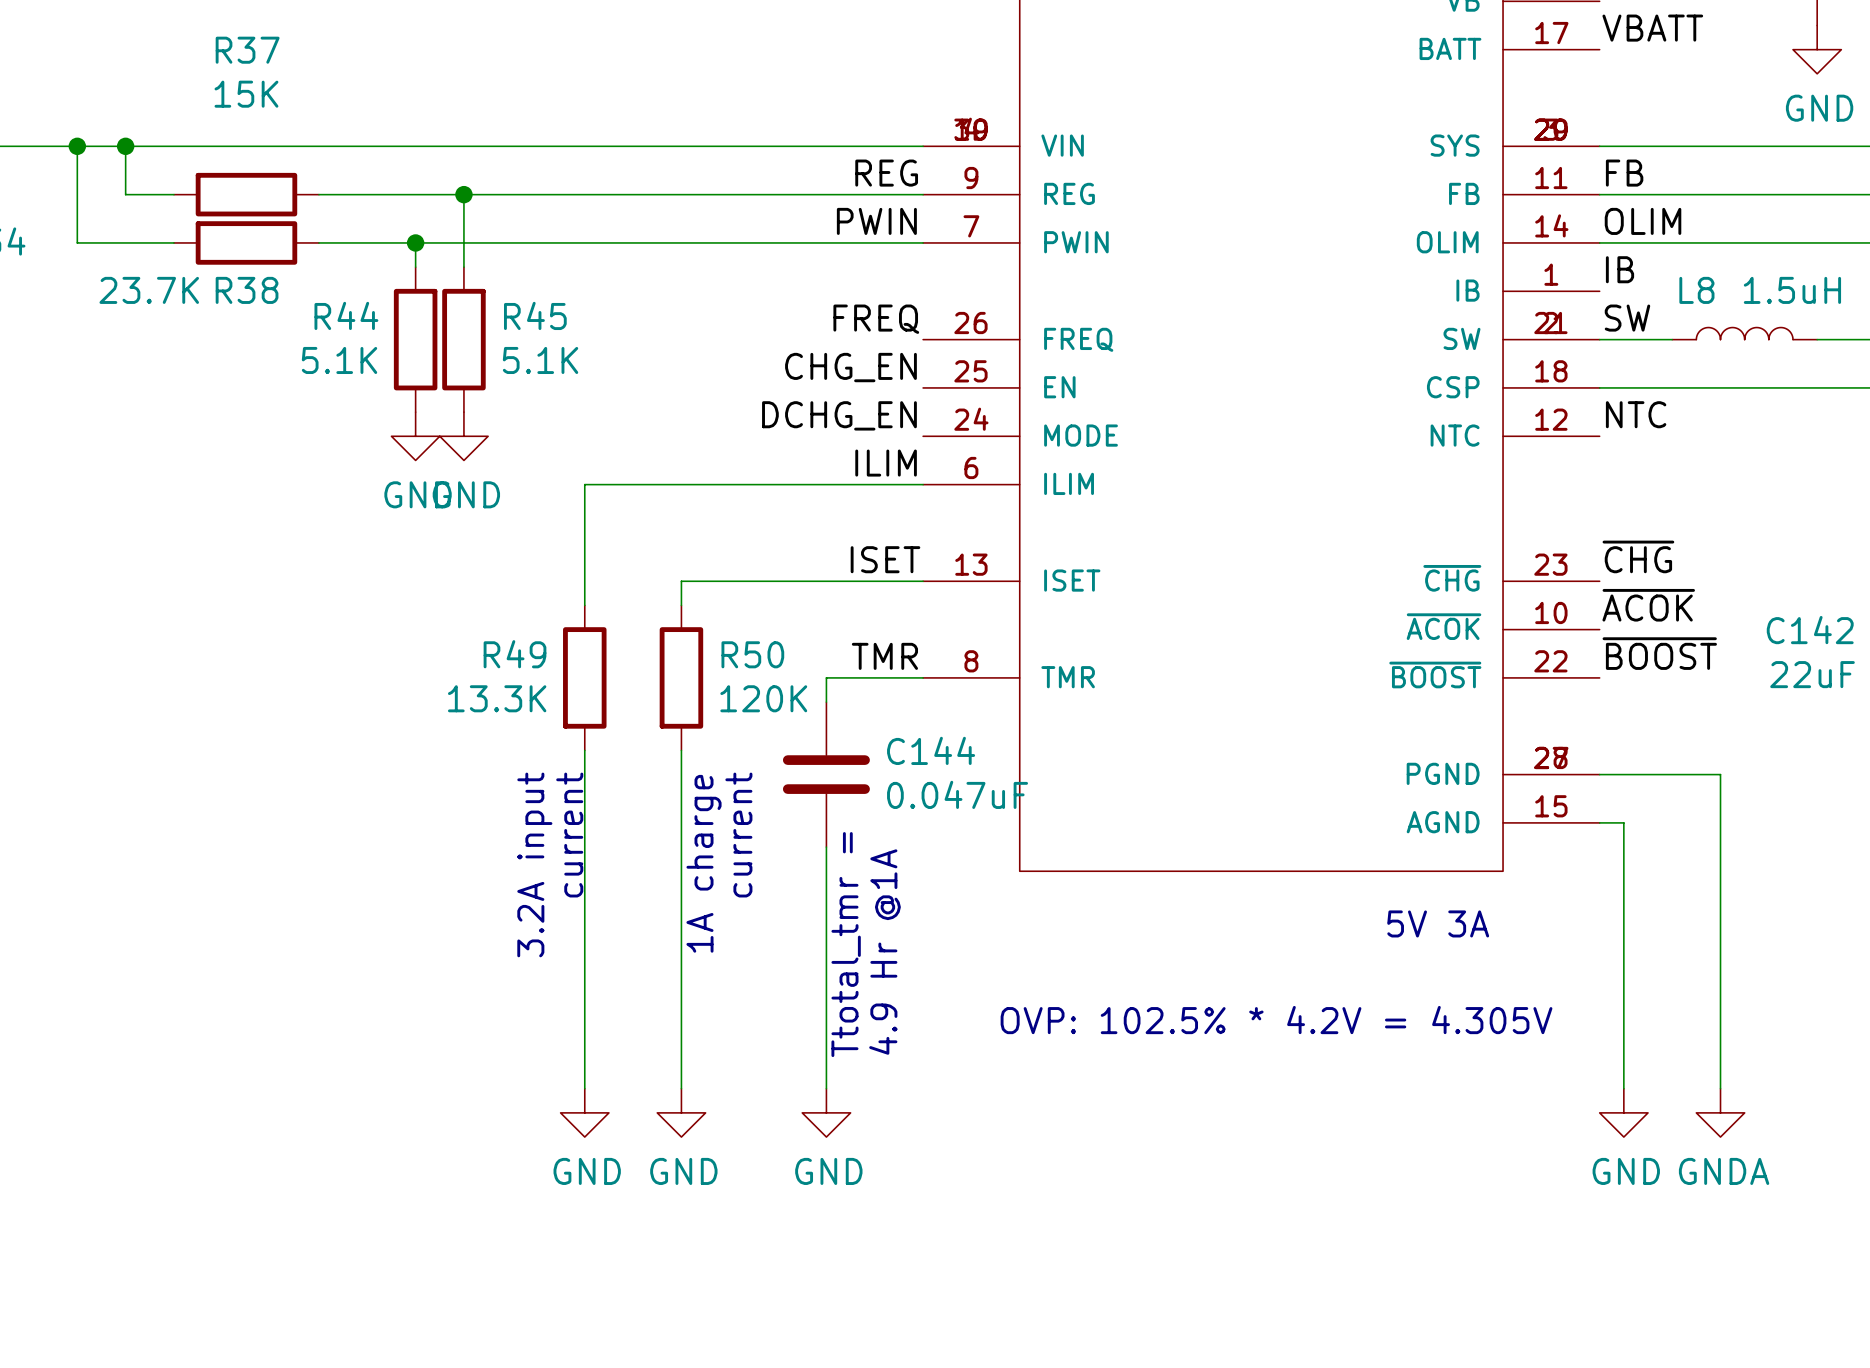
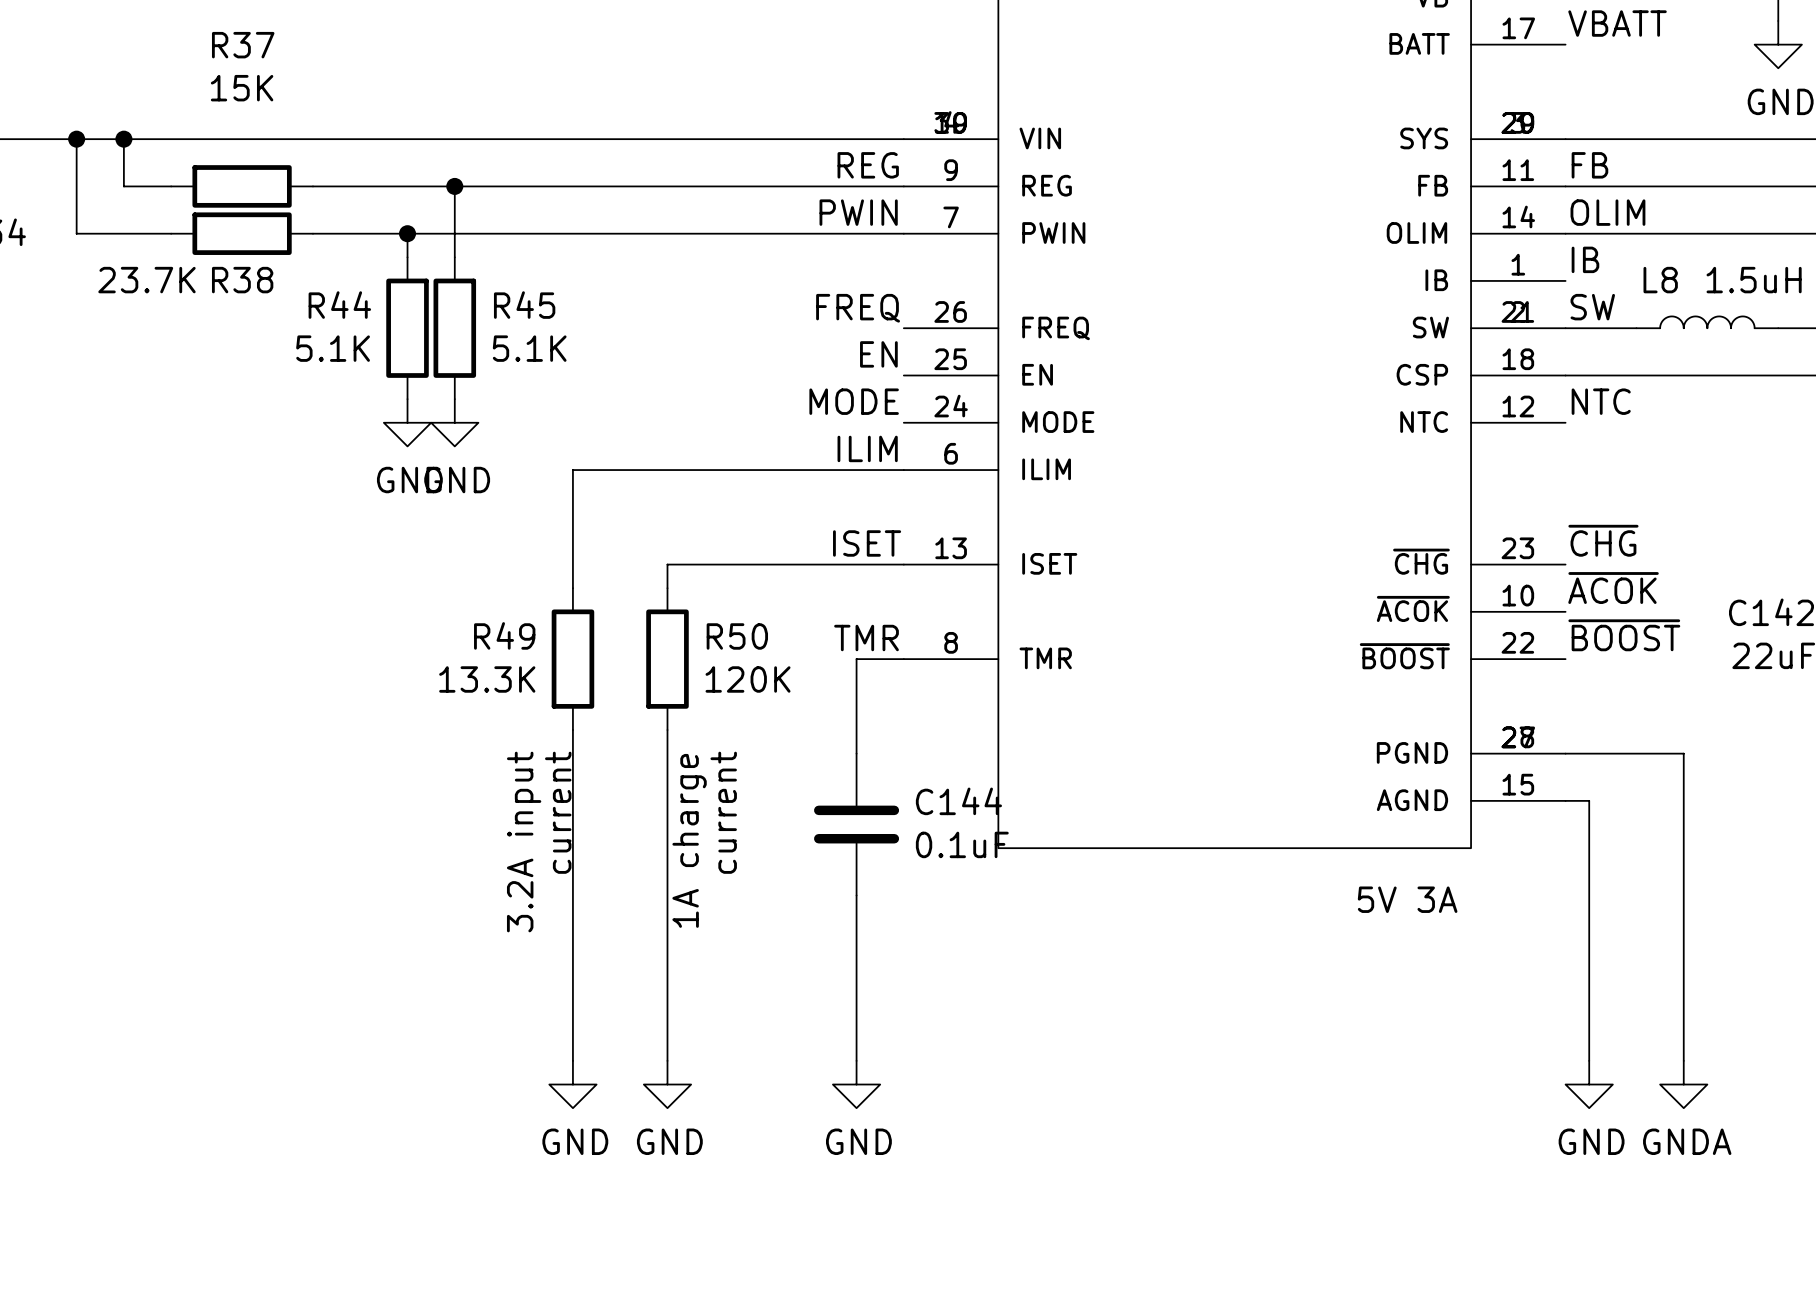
label: CHG_EN (850, 367) -> EN (878, 354)
label: DCHG_EN (839, 415) -> MODE (854, 401)
wire: (874, 677) (826, 677) (826, 702) -> (856, 659) (856, 753)
C144 position: (826, 774) -> (856, 824)
C144 value: 0.047uF (957, 794) -> 0.1uF (962, 844)
wire: (826, 847) (826, 1088) -> none
wire: none -> (856, 895) (856, 1060)
text: Ttotal_tmr = (846, 944) -> none
text: 4.9 Hr @1A (885, 952) -> none
text: OVP: 102.5% * 4.2V = 4.305V (1276, 1020) -> none
power symbol position: GND (826, 1112) -> GND (856, 1084)

